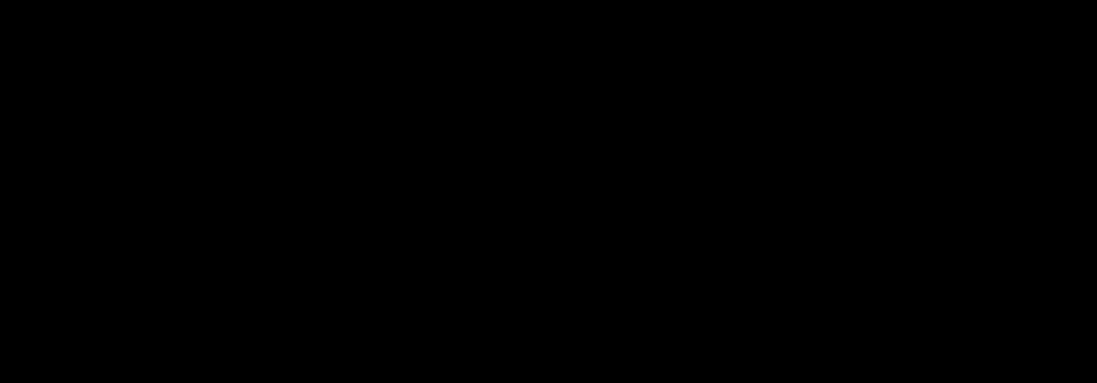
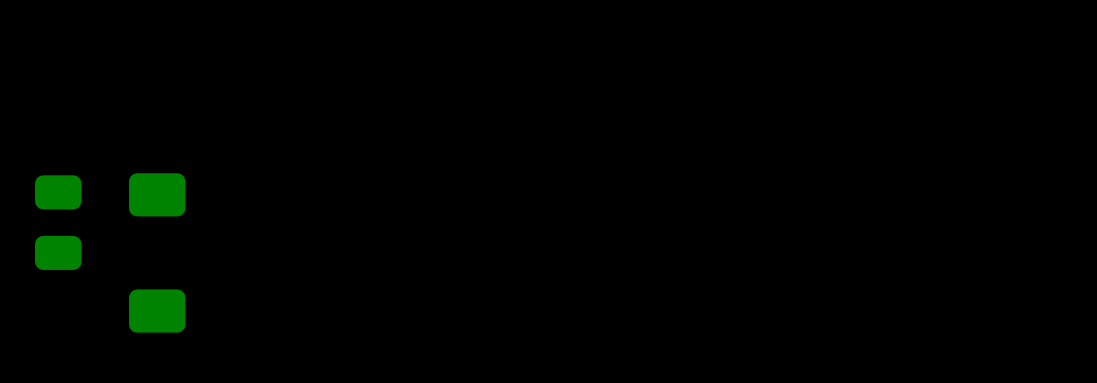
part: none -> (58, 222)
part: none -> (157, 252)

